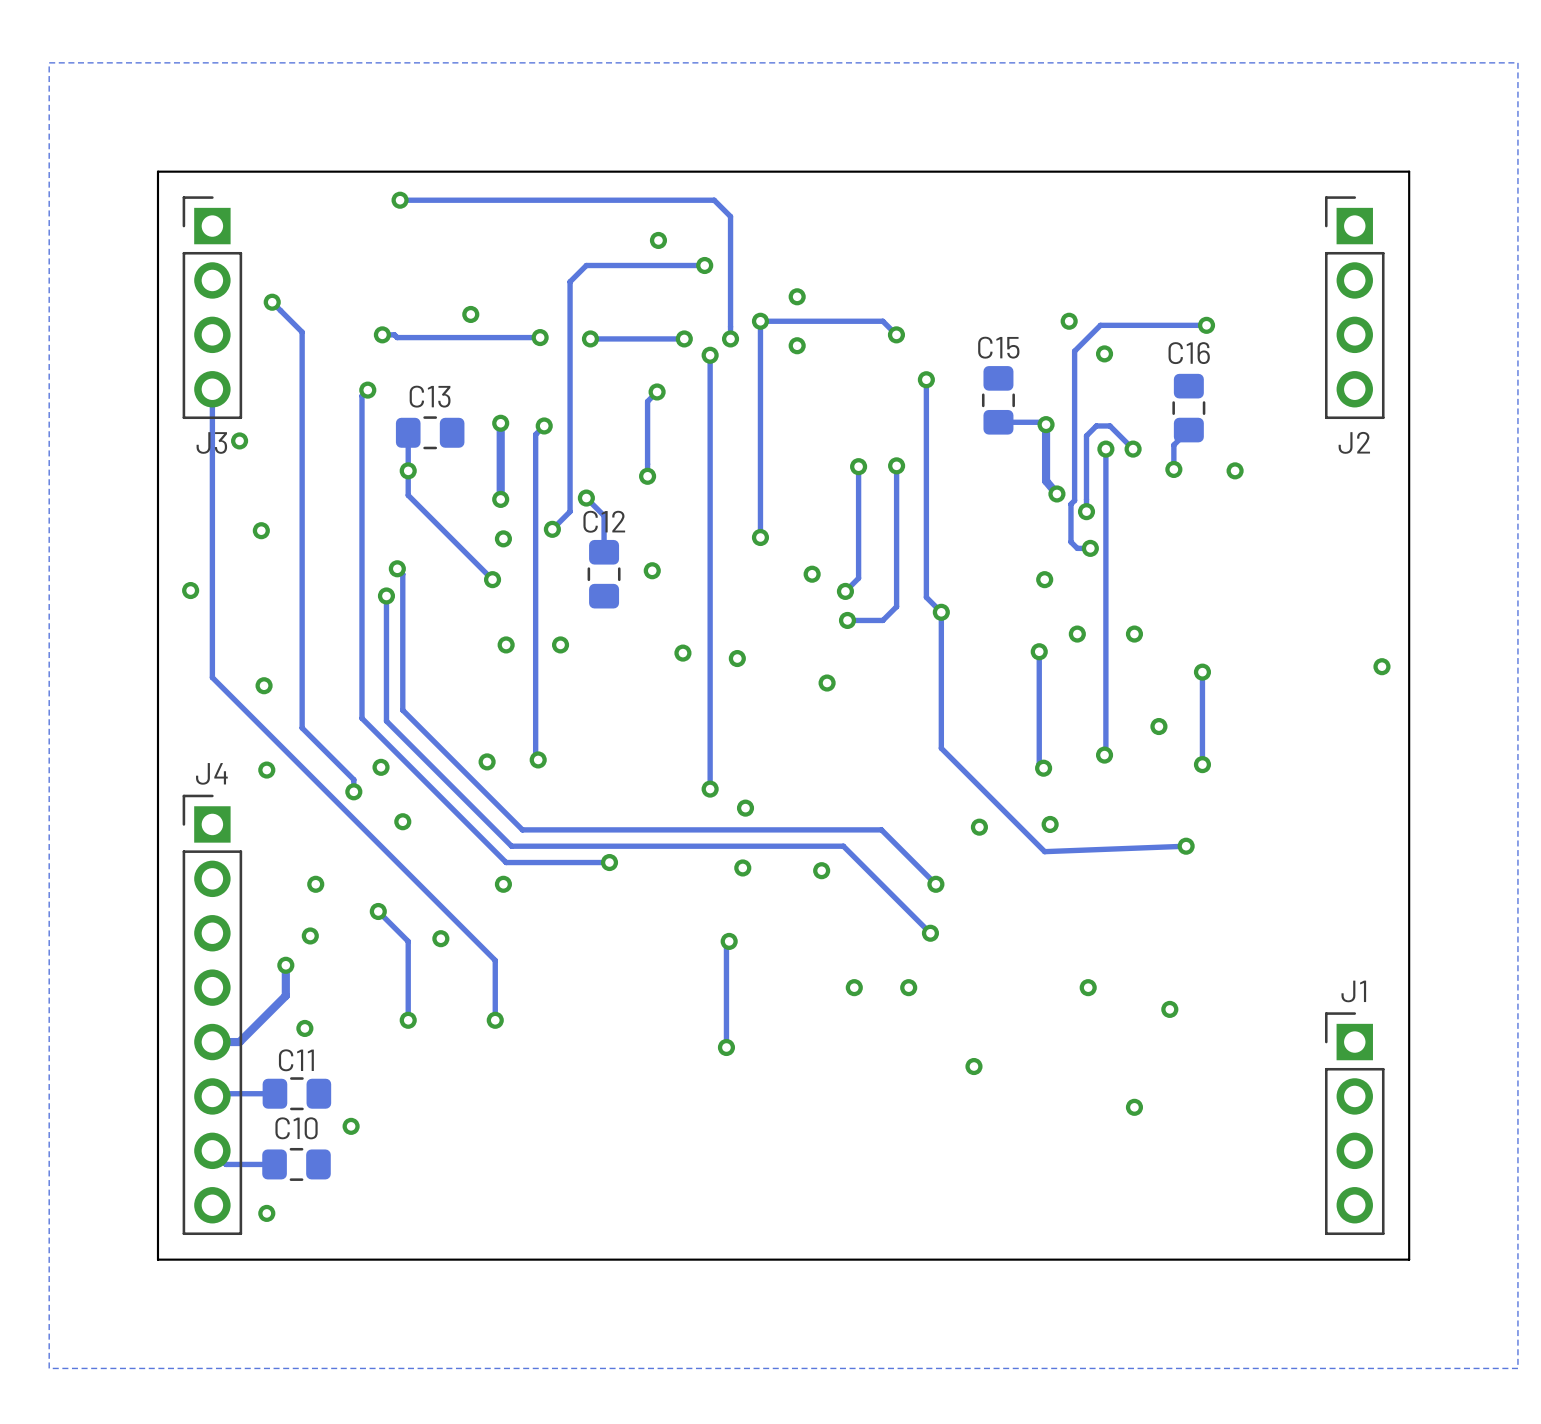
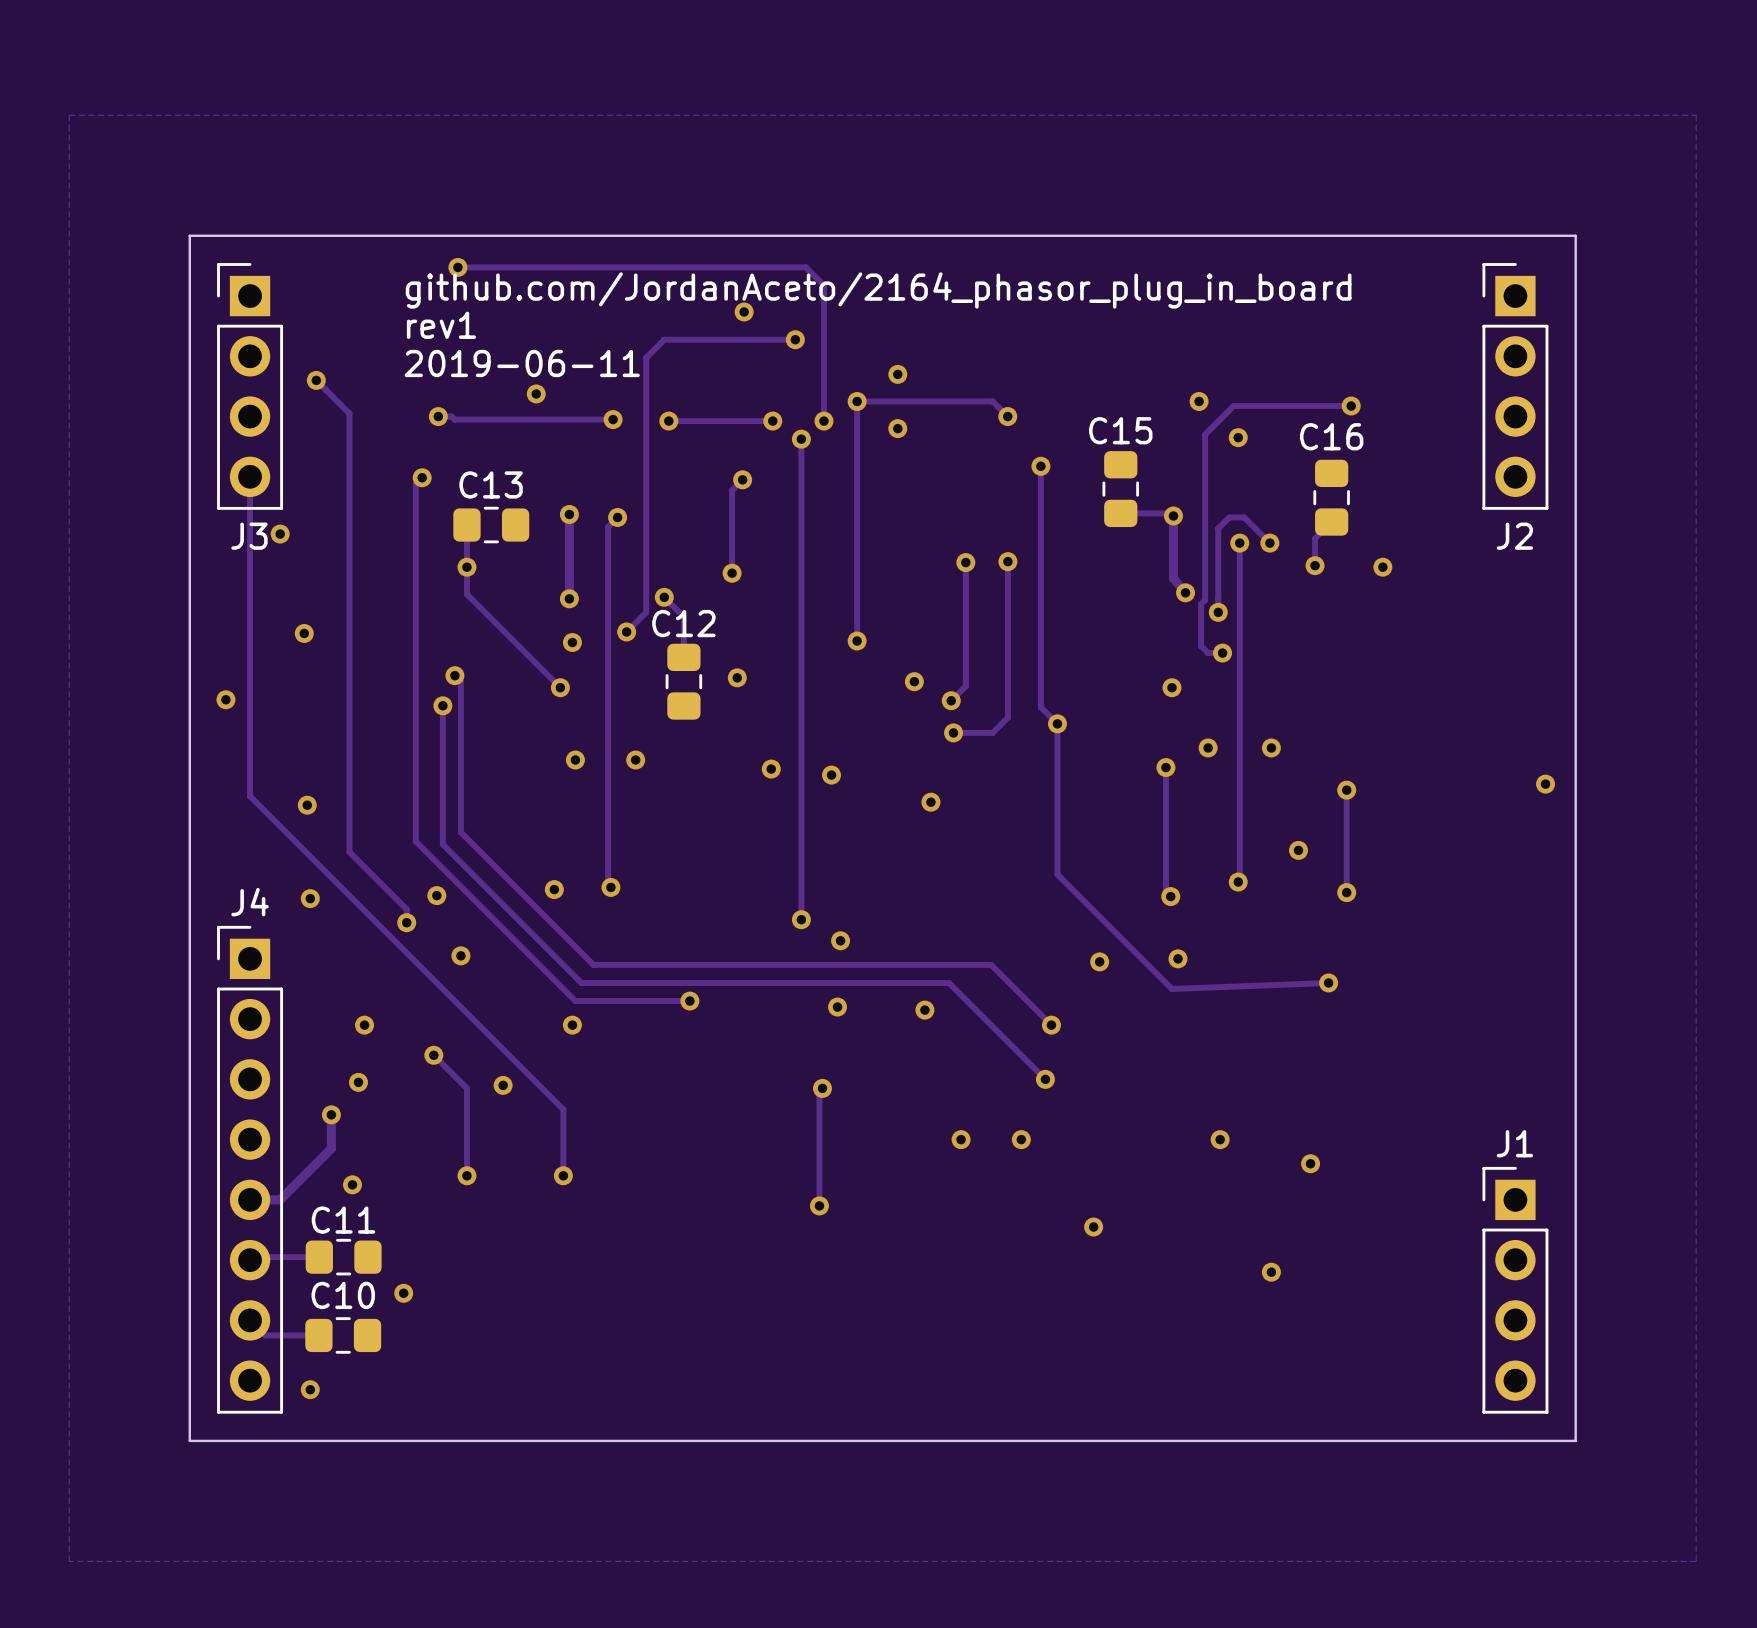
text: none -> github.com/JordanAceto/2164_phasor_plug_in_board (878, 290)
text: none -> rev1 (441, 325)
text: none -> 2019-06-11 (522, 363)

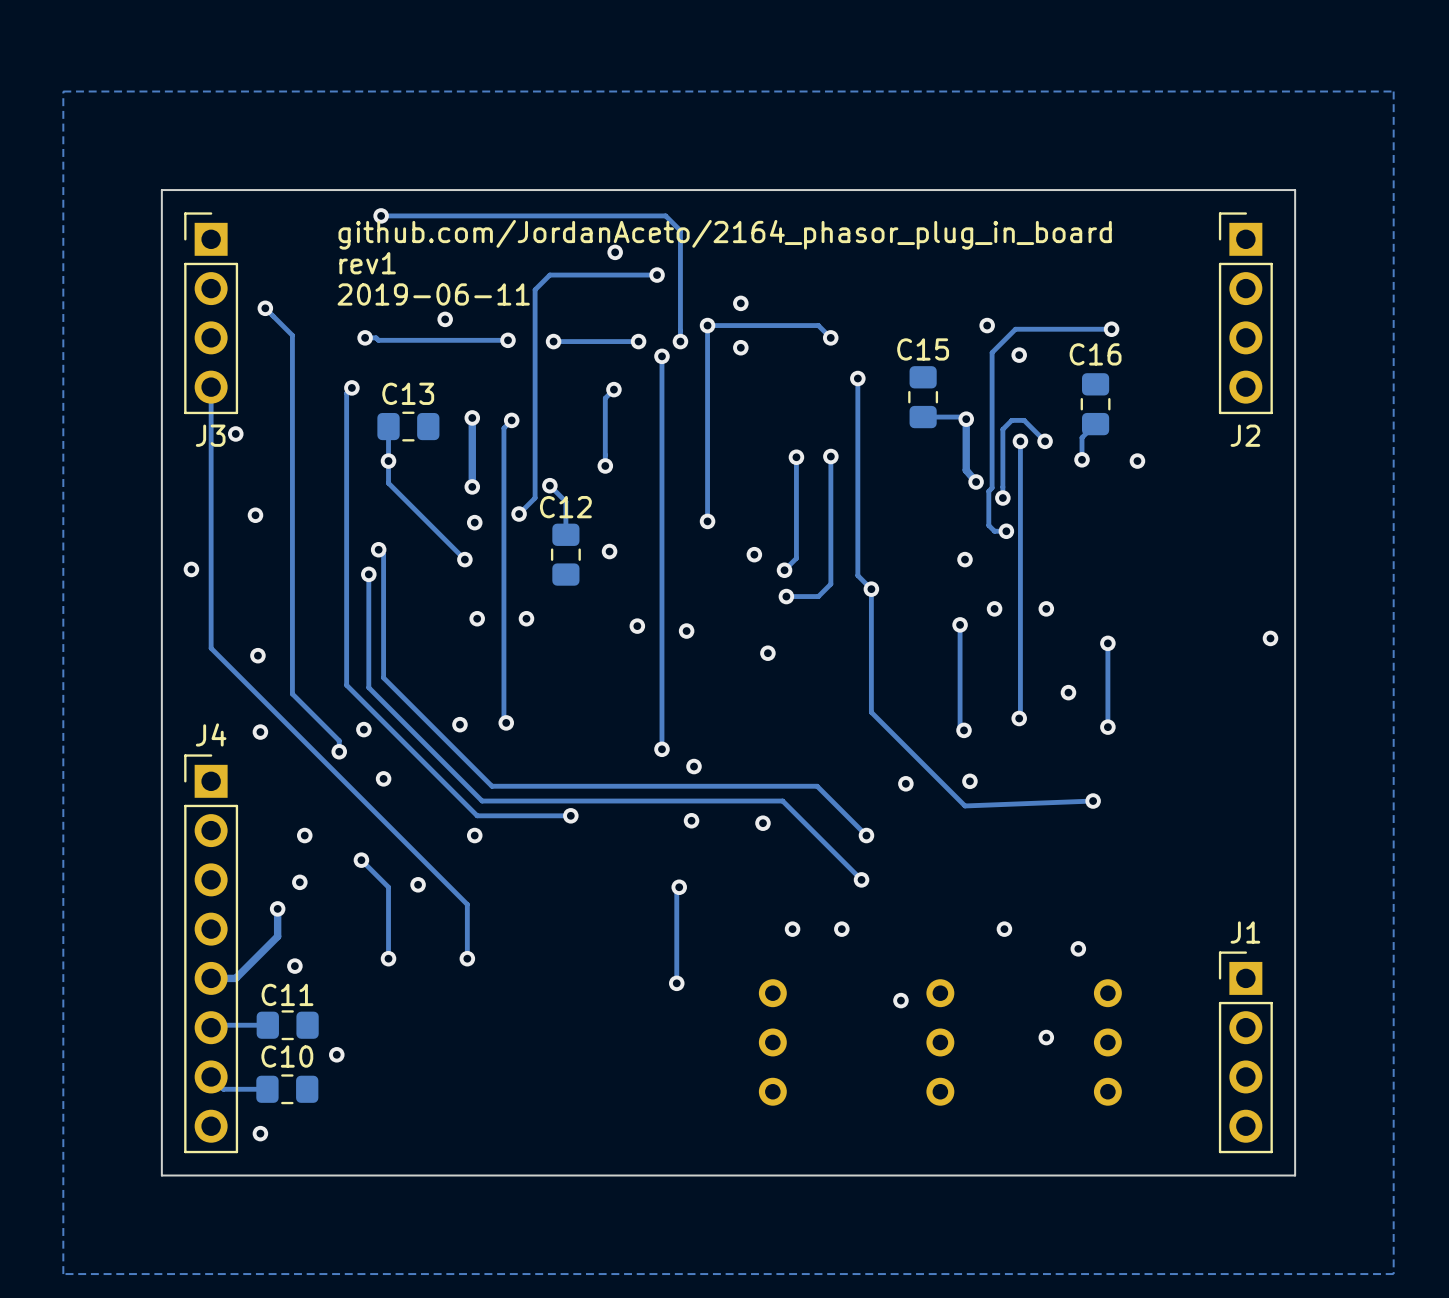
part: none -> (772, 1042)
part: none -> (940, 1042)
part: none -> (1107, 1042)

